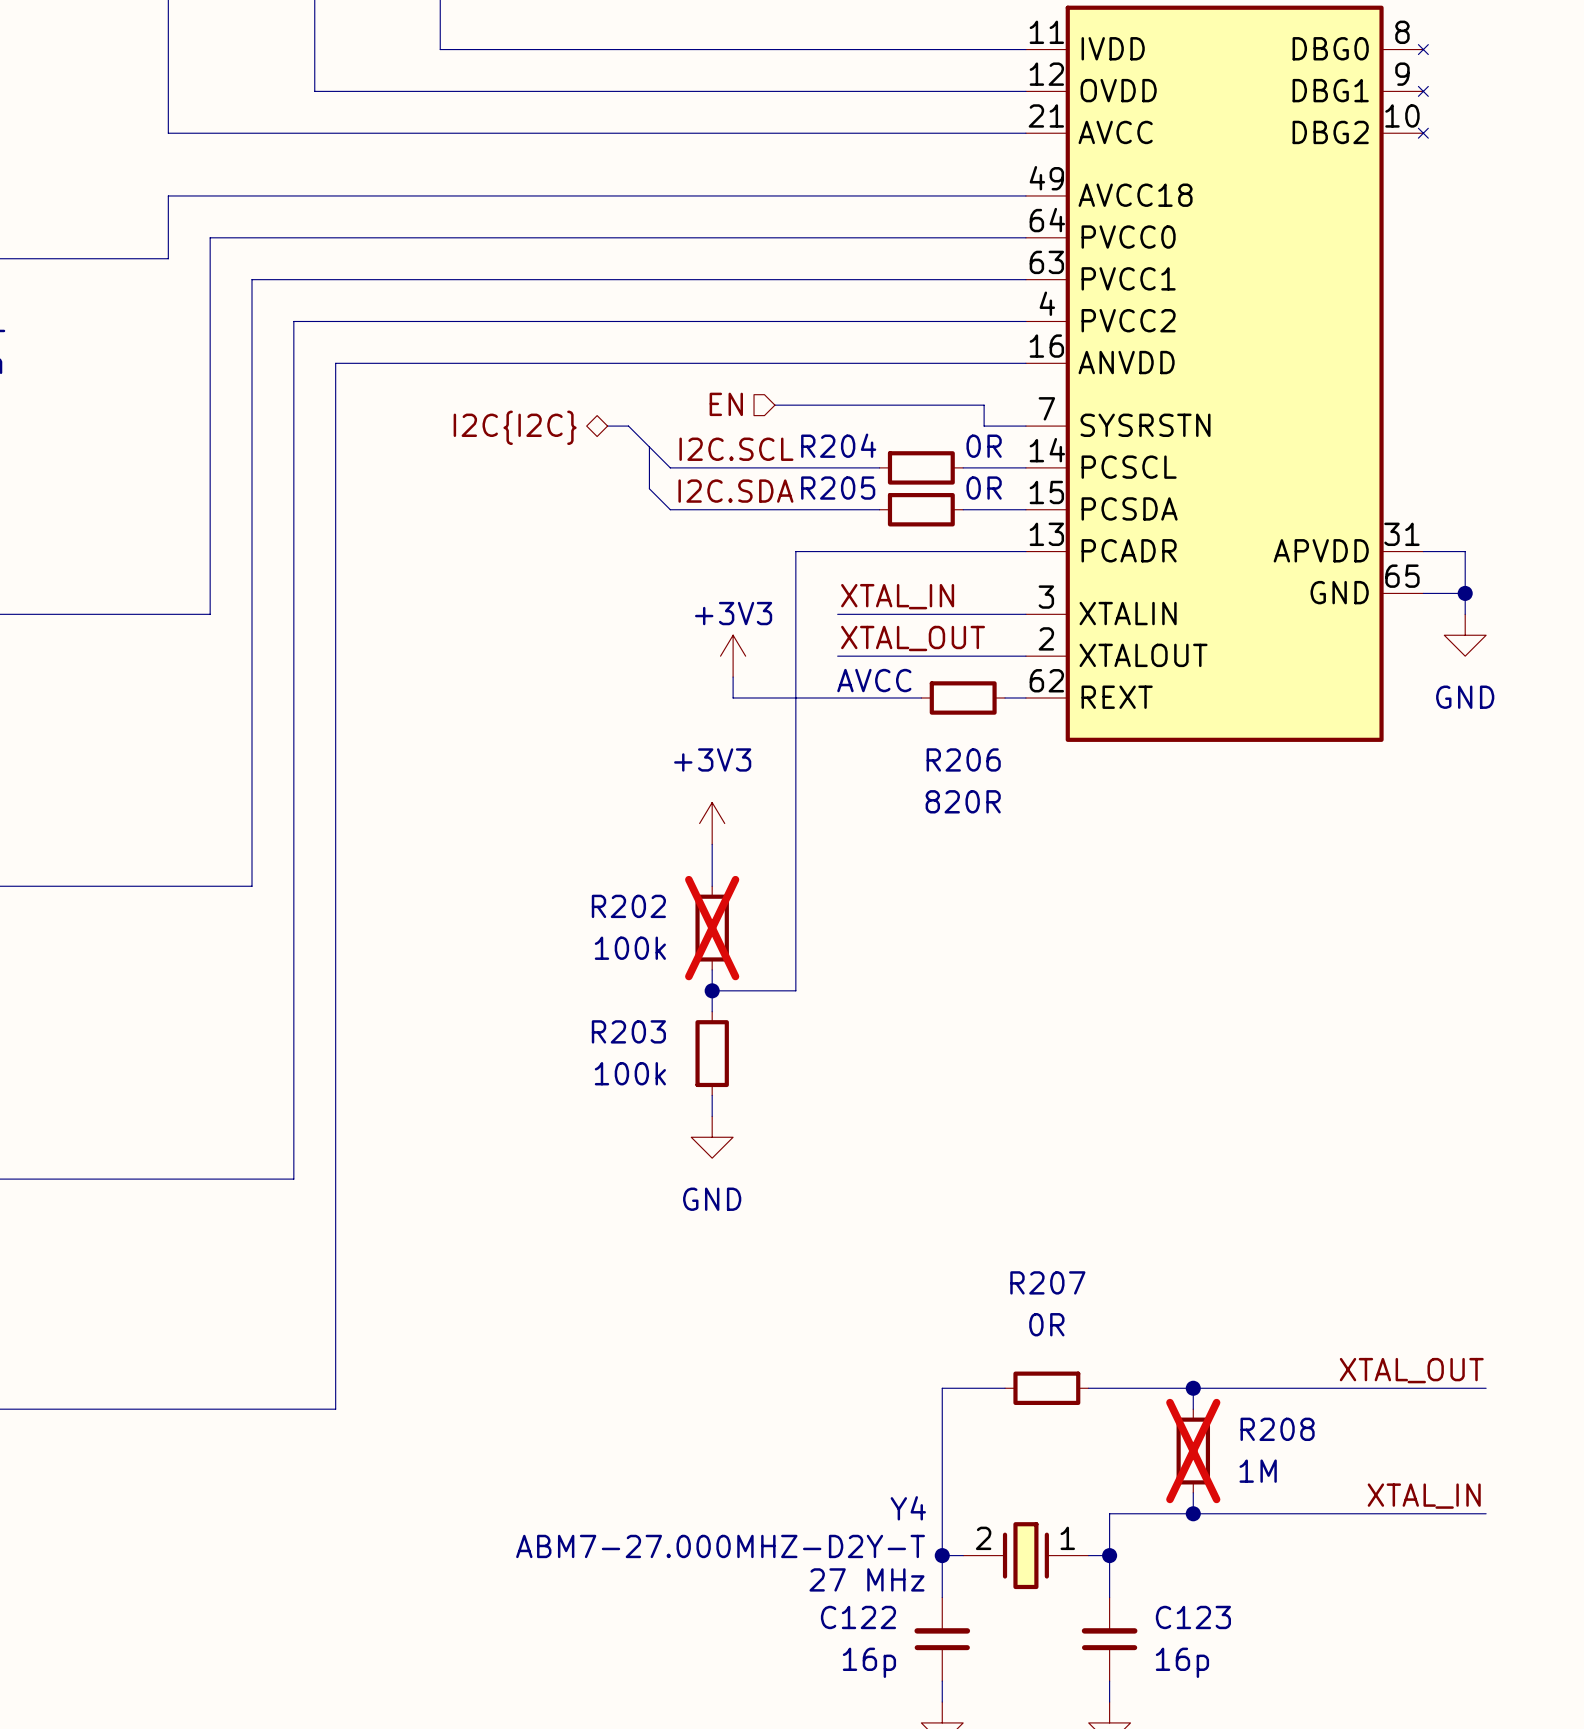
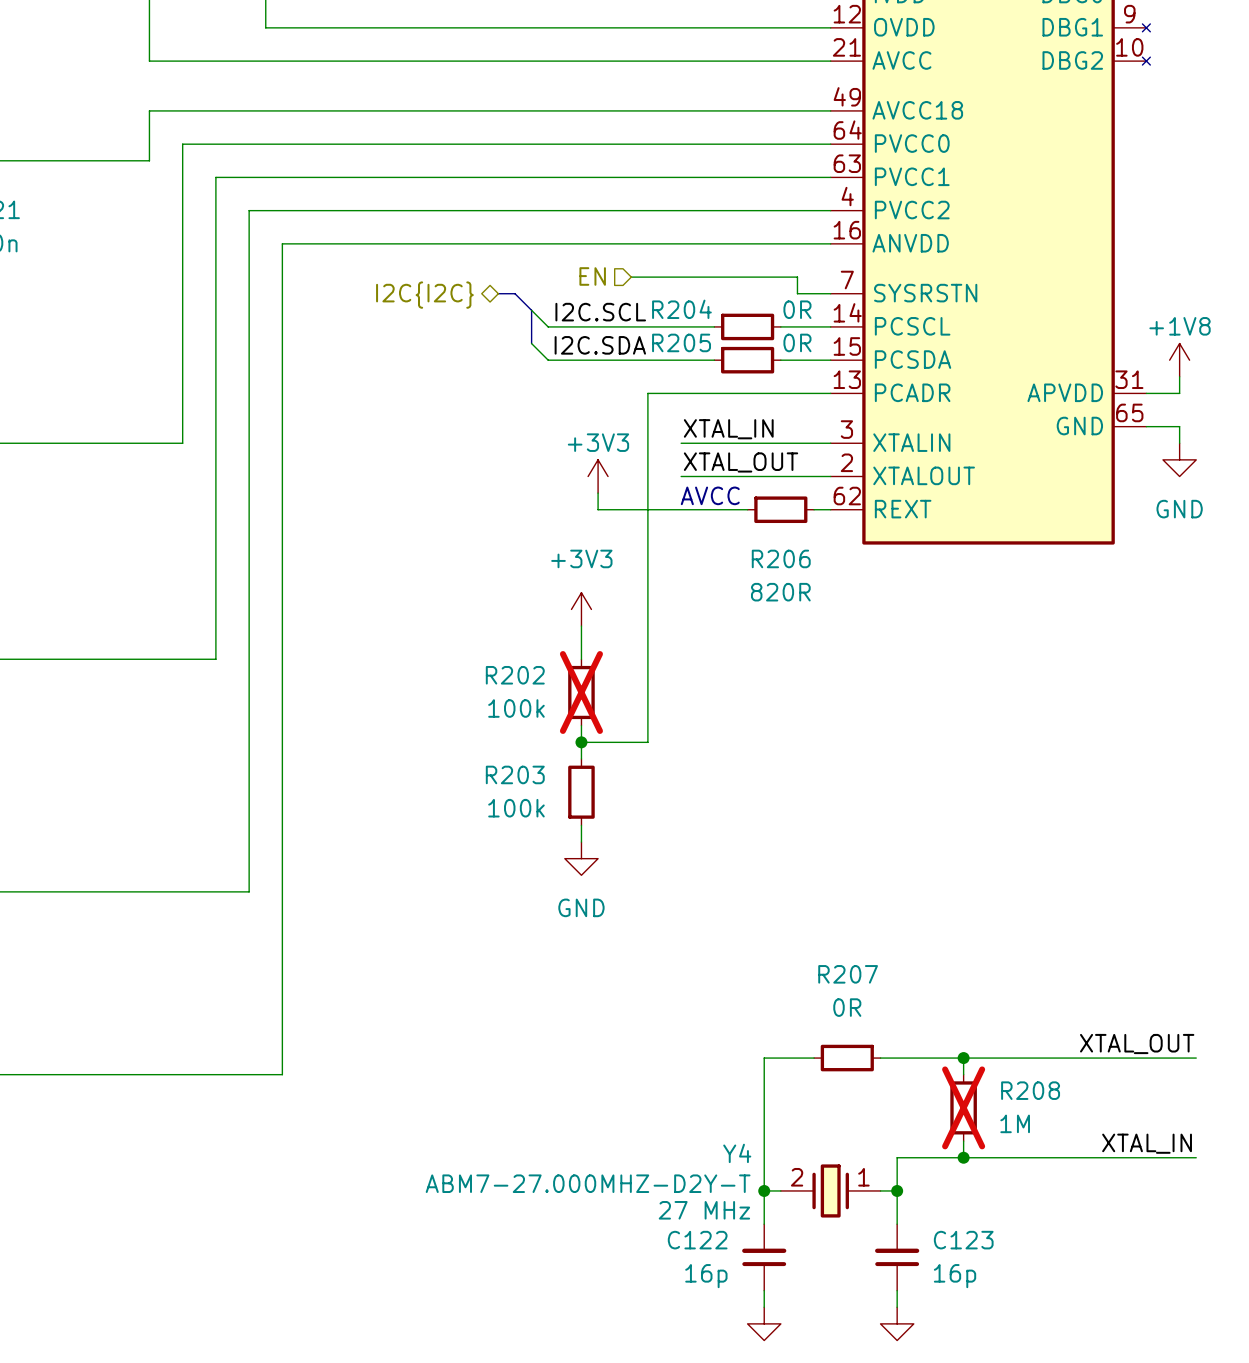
power symbol: none -> +1V8 (1179, 360)
wire: (1465, 551) (1465, 593) -> (1179, 393) (1179, 376)
junction: (1465, 593) -> none

